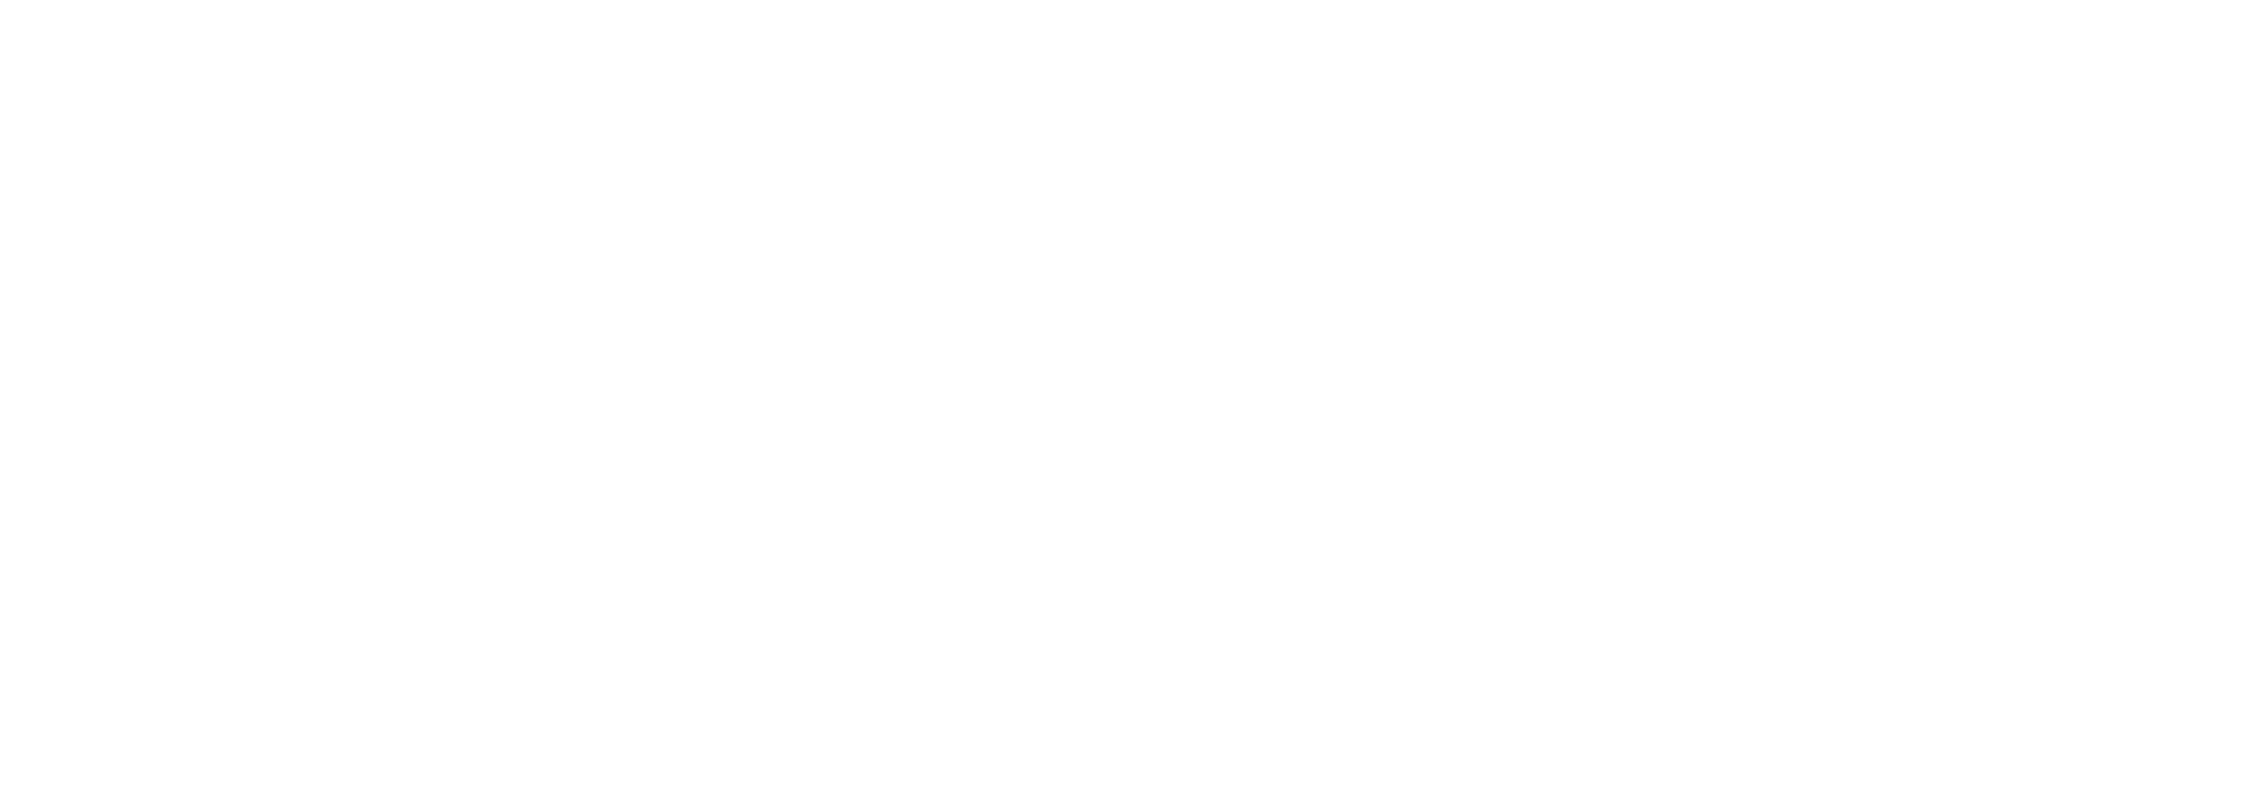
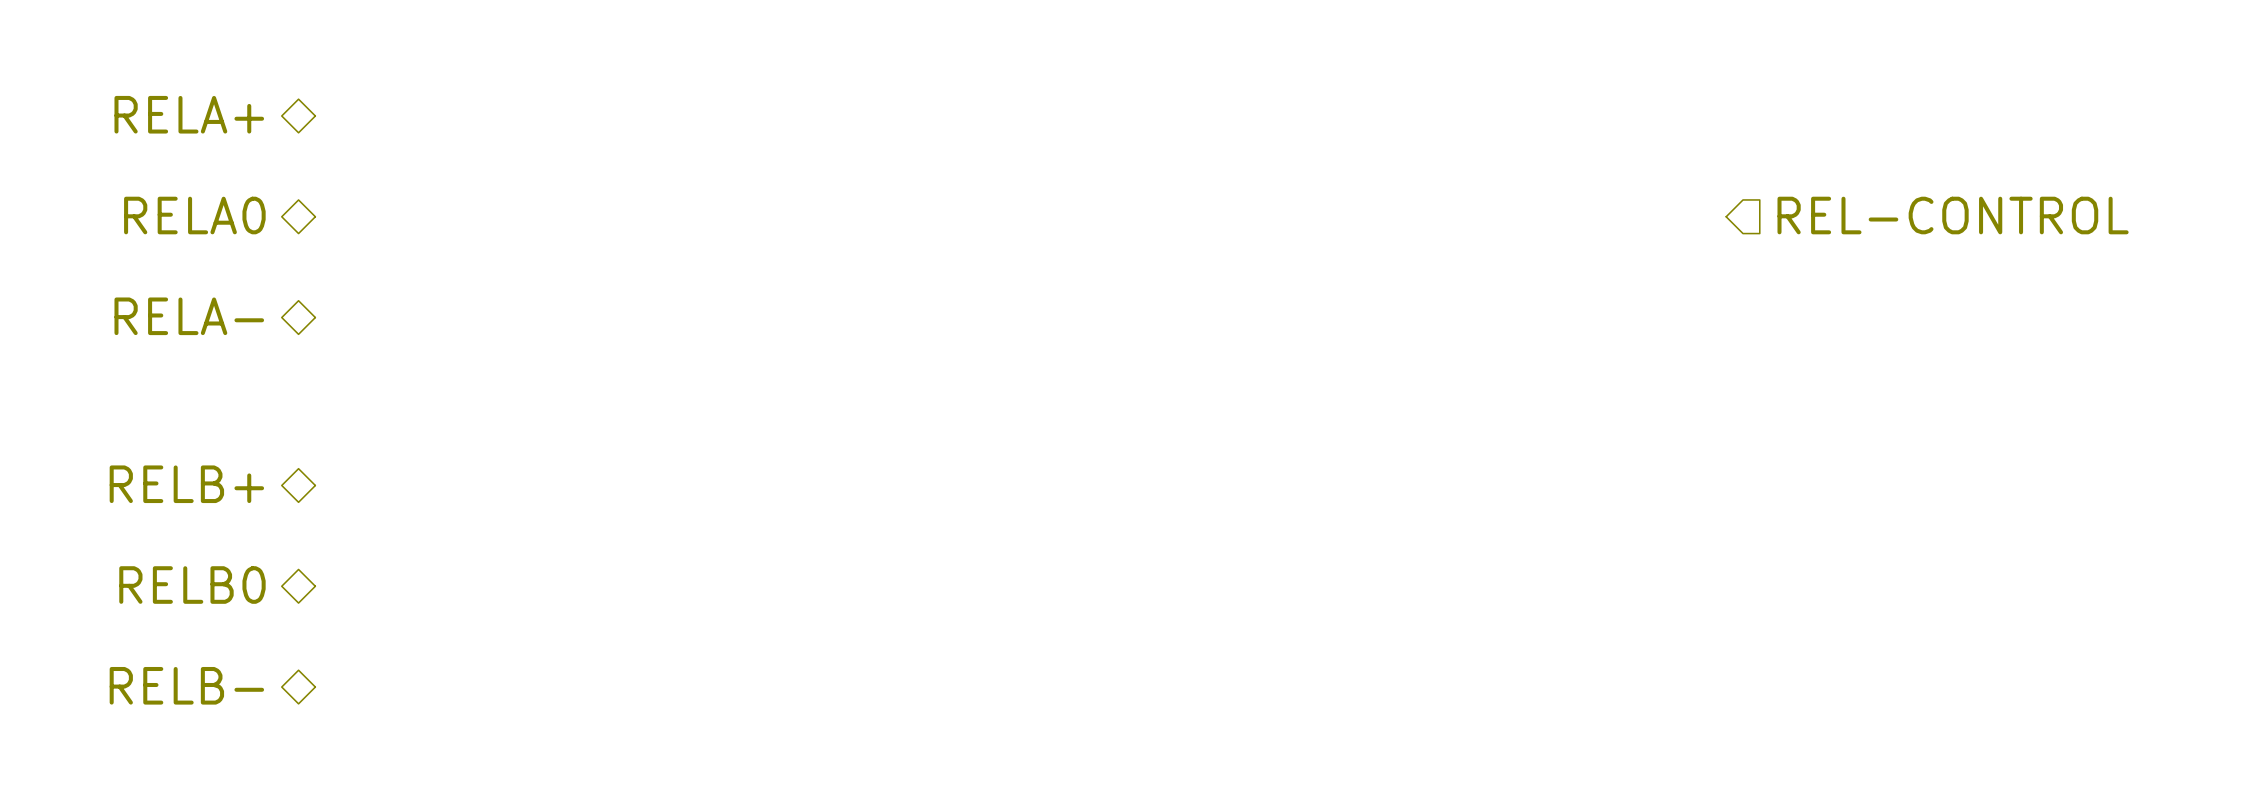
hierarchical label: none -> RELA+ (189, 114)
hierarchical label: none -> RELA0 (194, 215)
hierarchical label: none -> REL-CONTROL (1953, 215)
hierarchical label: none -> RELA- (189, 316)
hierarchical label: none -> RELB+ (186, 484)
hierarchical label: none -> RELB0 (192, 585)
hierarchical label: none -> RELB- (186, 685)

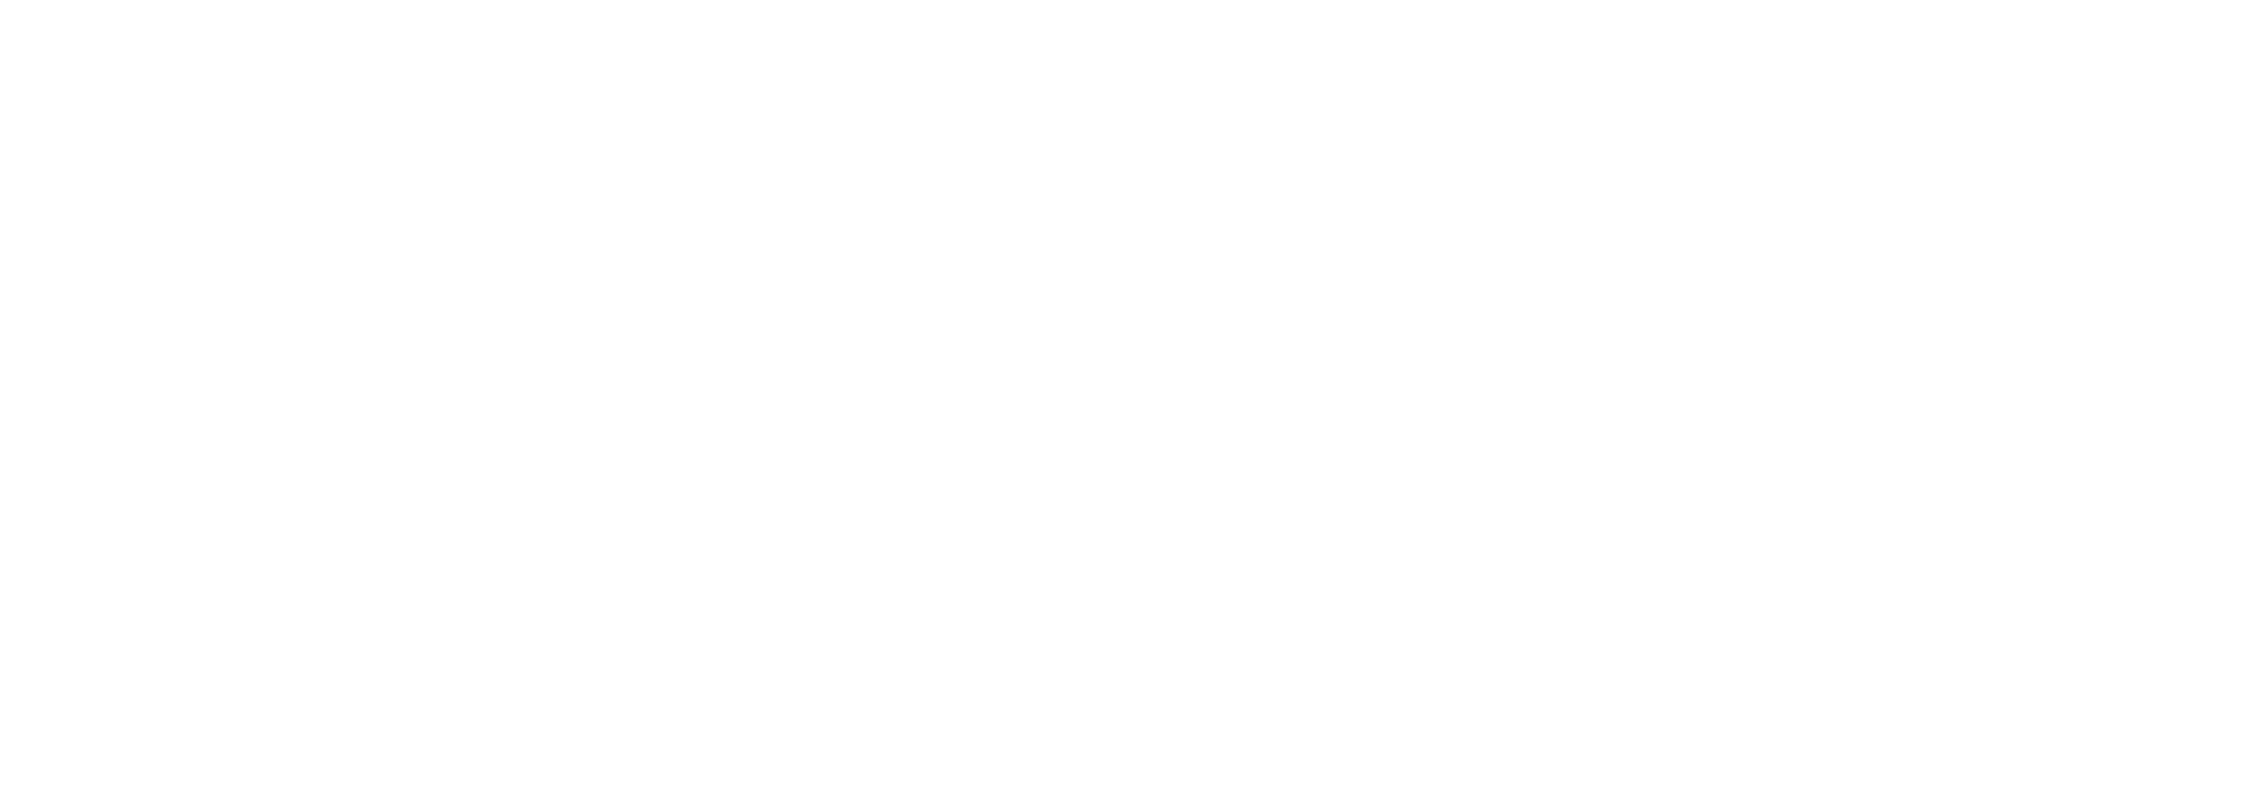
hierarchical label: RELA+ (189, 114) -> none
hierarchical label: RELA0 (194, 215) -> none
hierarchical label: REL-CONTROL (1953, 215) -> none
hierarchical label: RELA- (189, 316) -> none
hierarchical label: RELB+ (186, 484) -> none
hierarchical label: RELB0 (192, 585) -> none
hierarchical label: RELB- (186, 685) -> none

